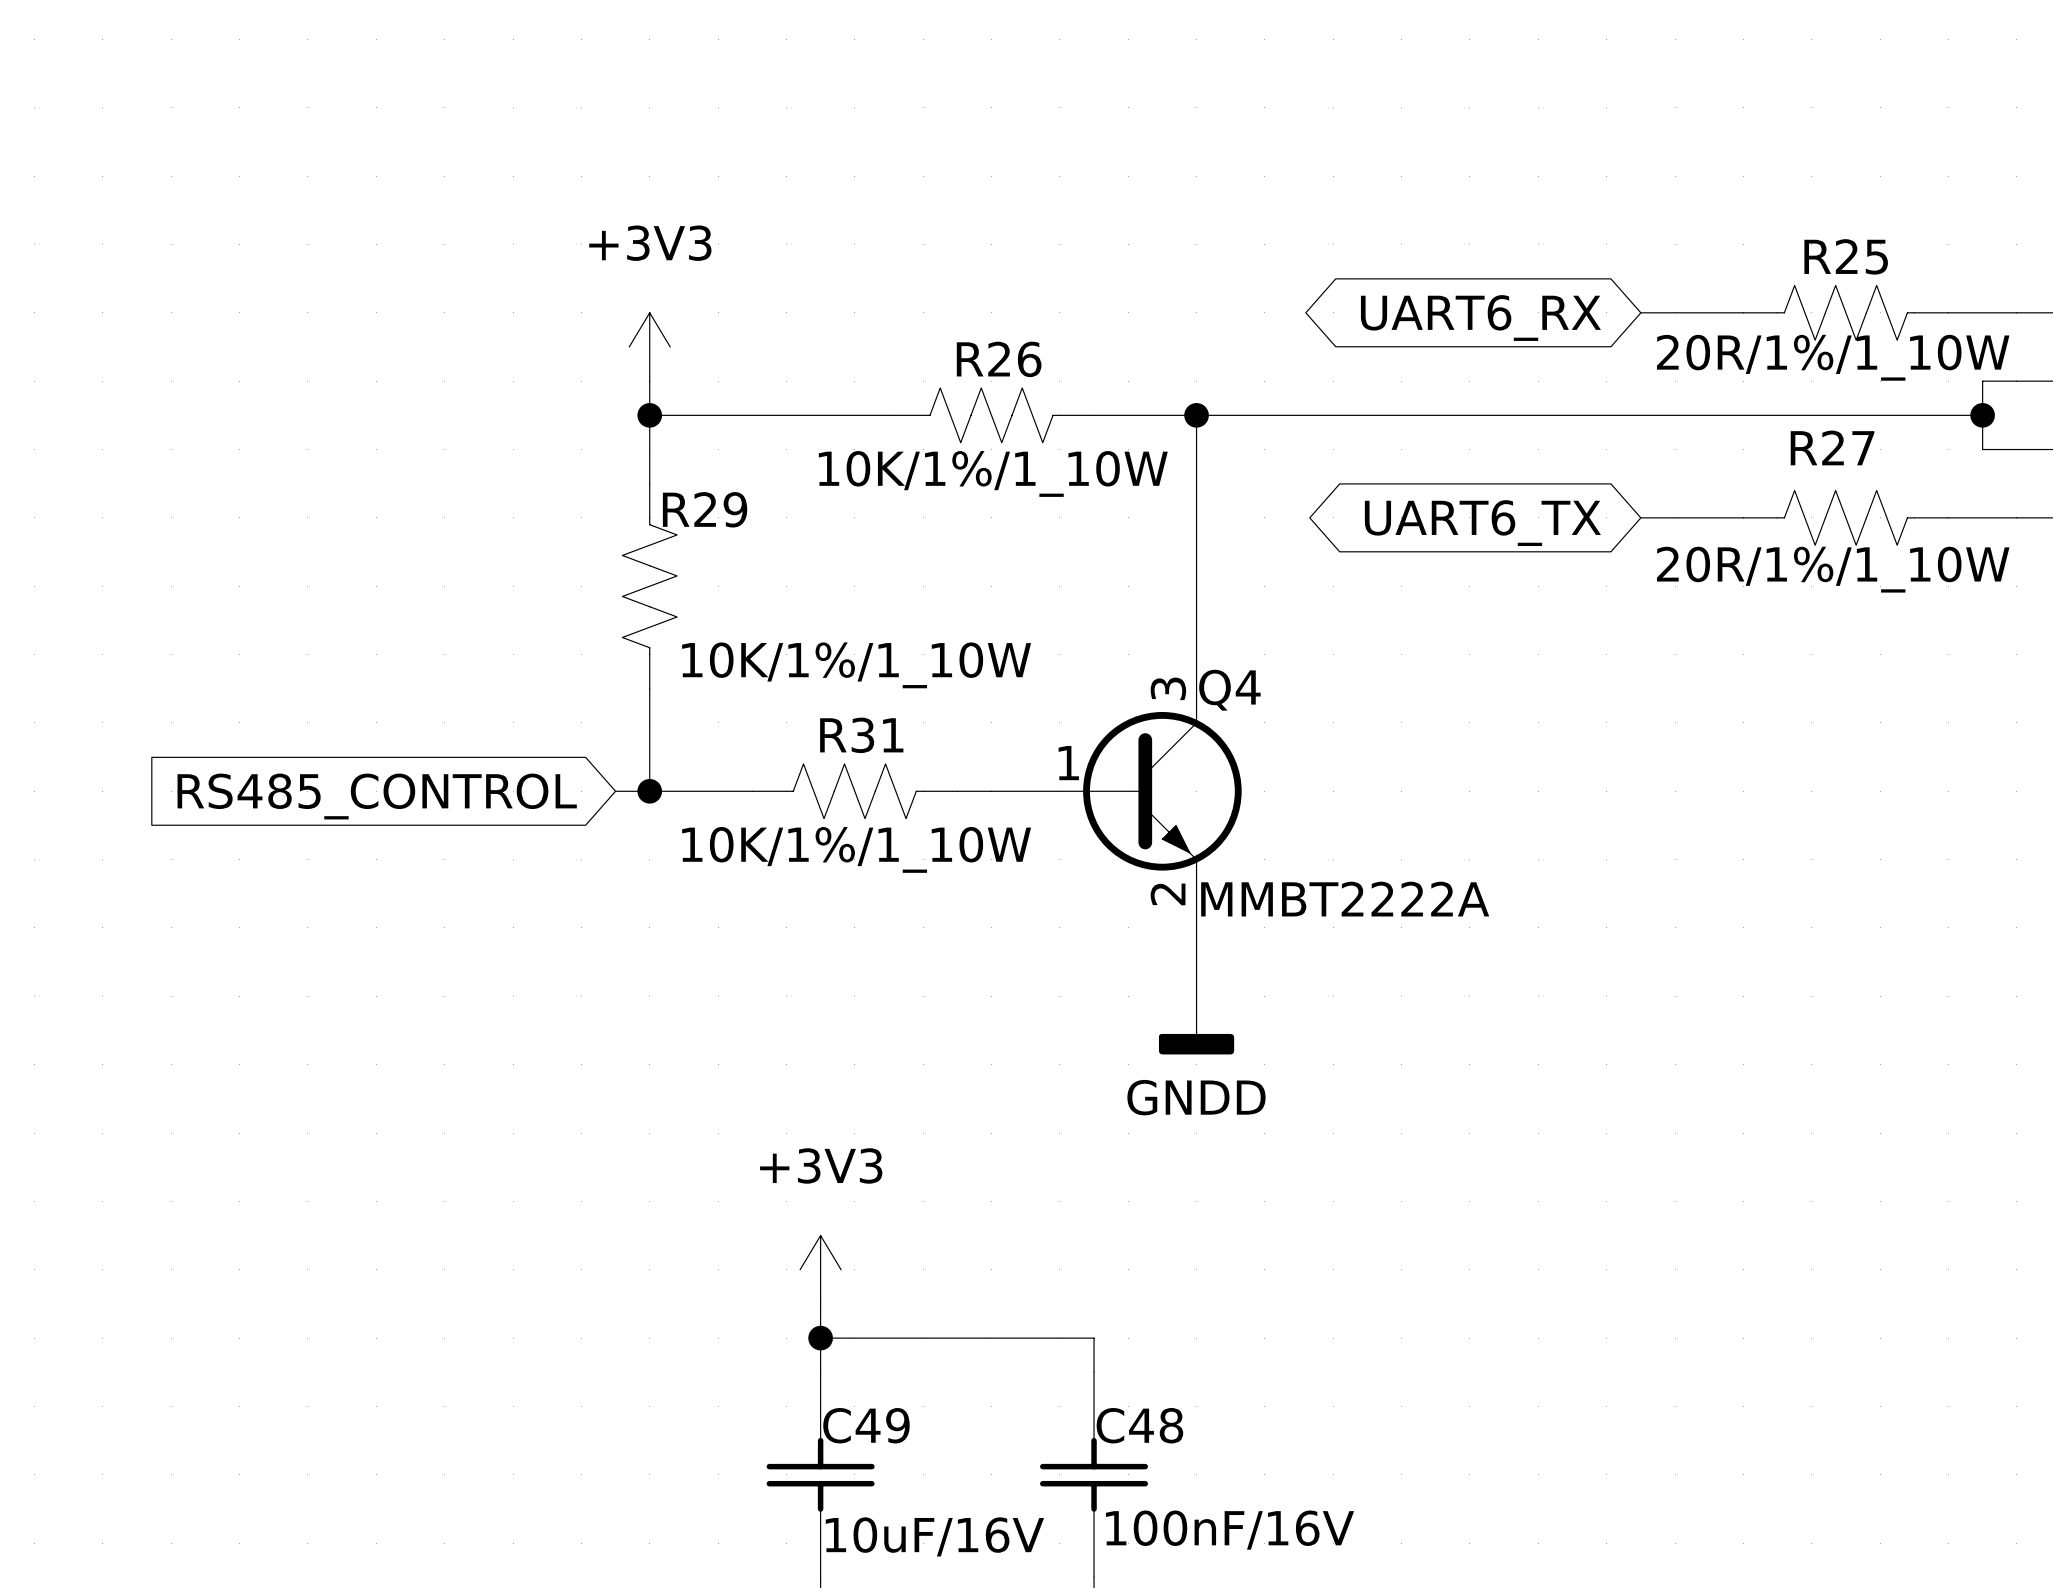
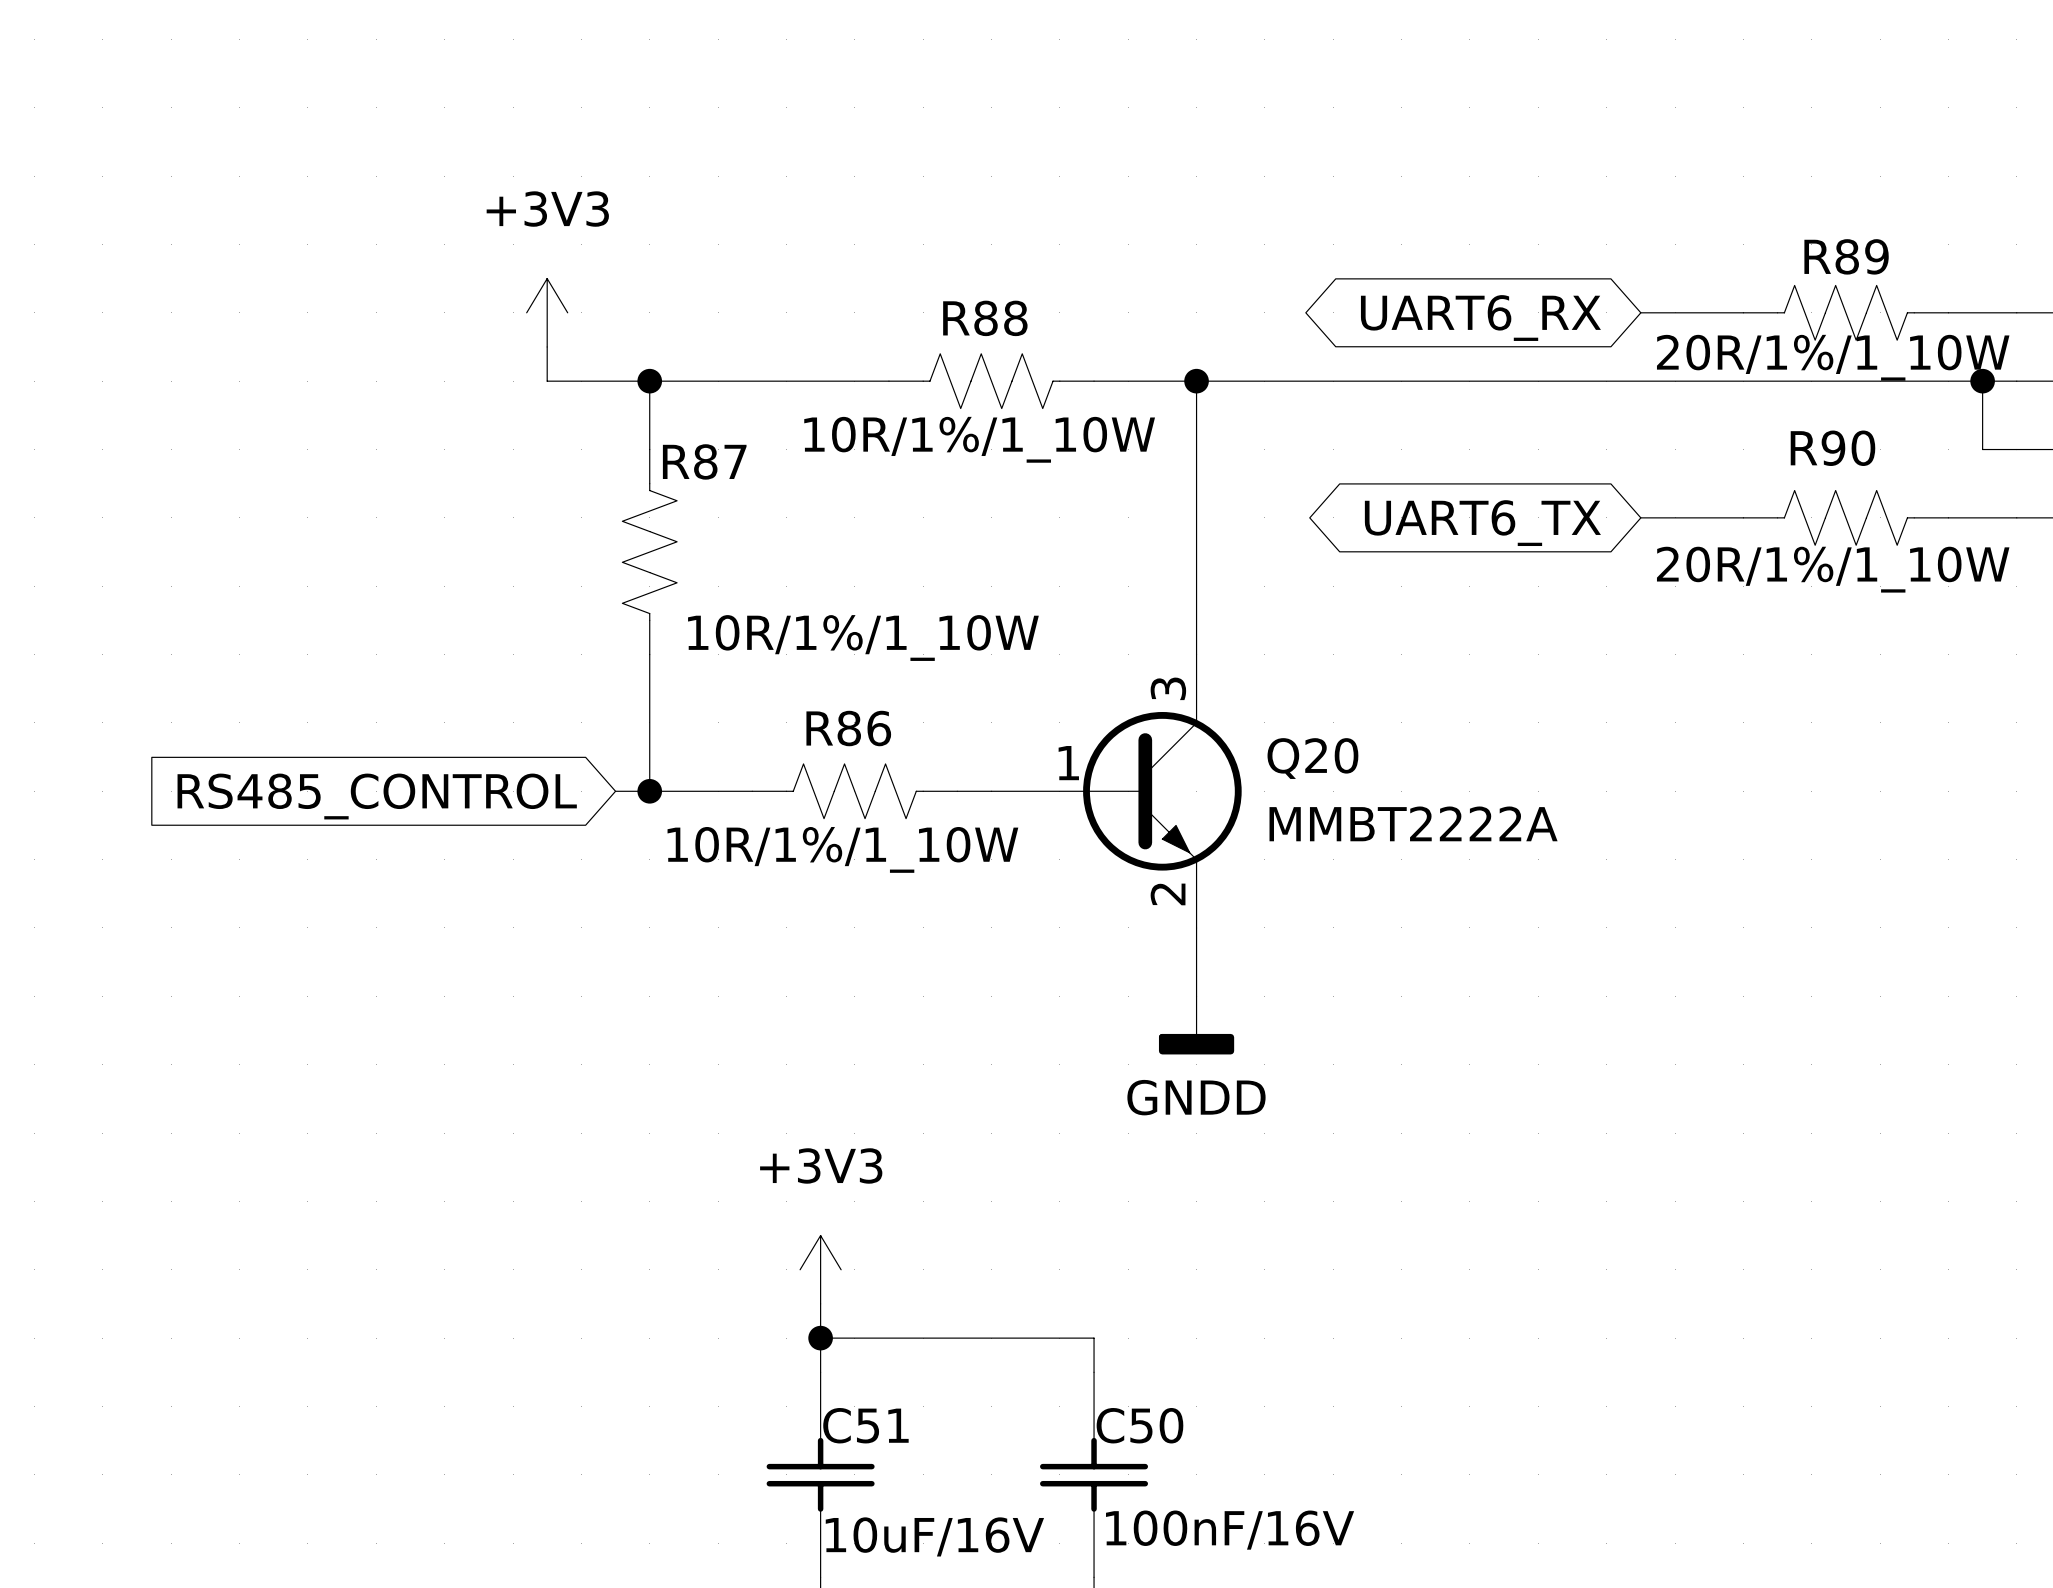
R25 name: R25 (1846, 256) -> R89 (1846, 256)
wire: none -> (547, 346) (547, 381) (888, 381)
power symbol position: +3V3 (649, 346) -> +3V3 (547, 312)
R88: none -> 10R/1%/1_10W (991, 381)
wire: none -> (1196, 381) (1196, 415)
wire: (649, 415) (888, 415) -> none
junction position: (649, 415) -> (649, 381)
R26: 10K/1%/1_10W (991, 415) -> none
wire: (1094, 415) (1982, 415) -> (1094, 381) (1982, 381)
junction position: (1196, 415) -> (1196, 381)
junction position: (1982, 415) -> (1982, 381)
R27 name: R27 (1832, 447) -> R90 (1832, 448)
R87: none -> 10R/1%/1_10W (649, 552)
R29: 10K/1%/1_10W (649, 586) -> none
Q4 name: Q4 (1229, 690) -> Q20 (1312, 758)
R31 name: R31 (861, 735) -> R86 (848, 728)
R31 value: 10K/1%/1_10W (856, 849) -> 10R/1%/1_10W (842, 849)
Q4 value position: MMBT2222A (1345, 899) -> MMBT2222A (1413, 823)
C49 name: C49 (866, 1425) -> C51 (865, 1425)
C48 name: C48 (1139, 1425) -> C50 (1139, 1425)

